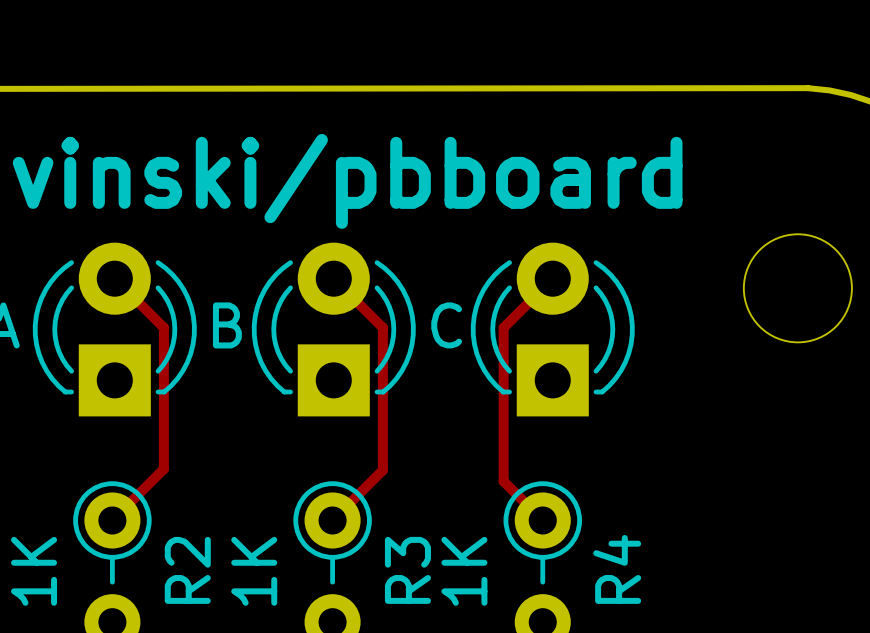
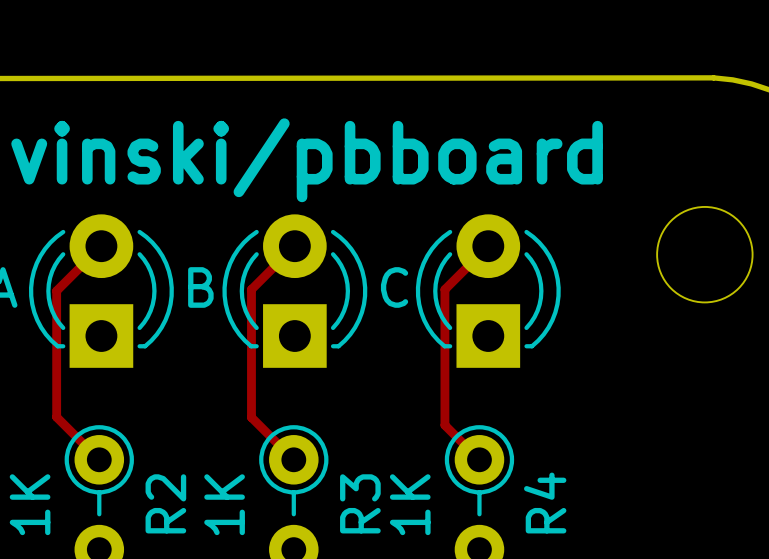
track: (114, 278) (163, 327) (163, 468) (112, 520) -> (101, 246) (56, 290) (56, 417) (99, 459)
track: (333, 278) (382, 327) (382, 470) (332, 520) -> (294, 246) (251, 289) (251, 417) (293, 459)

